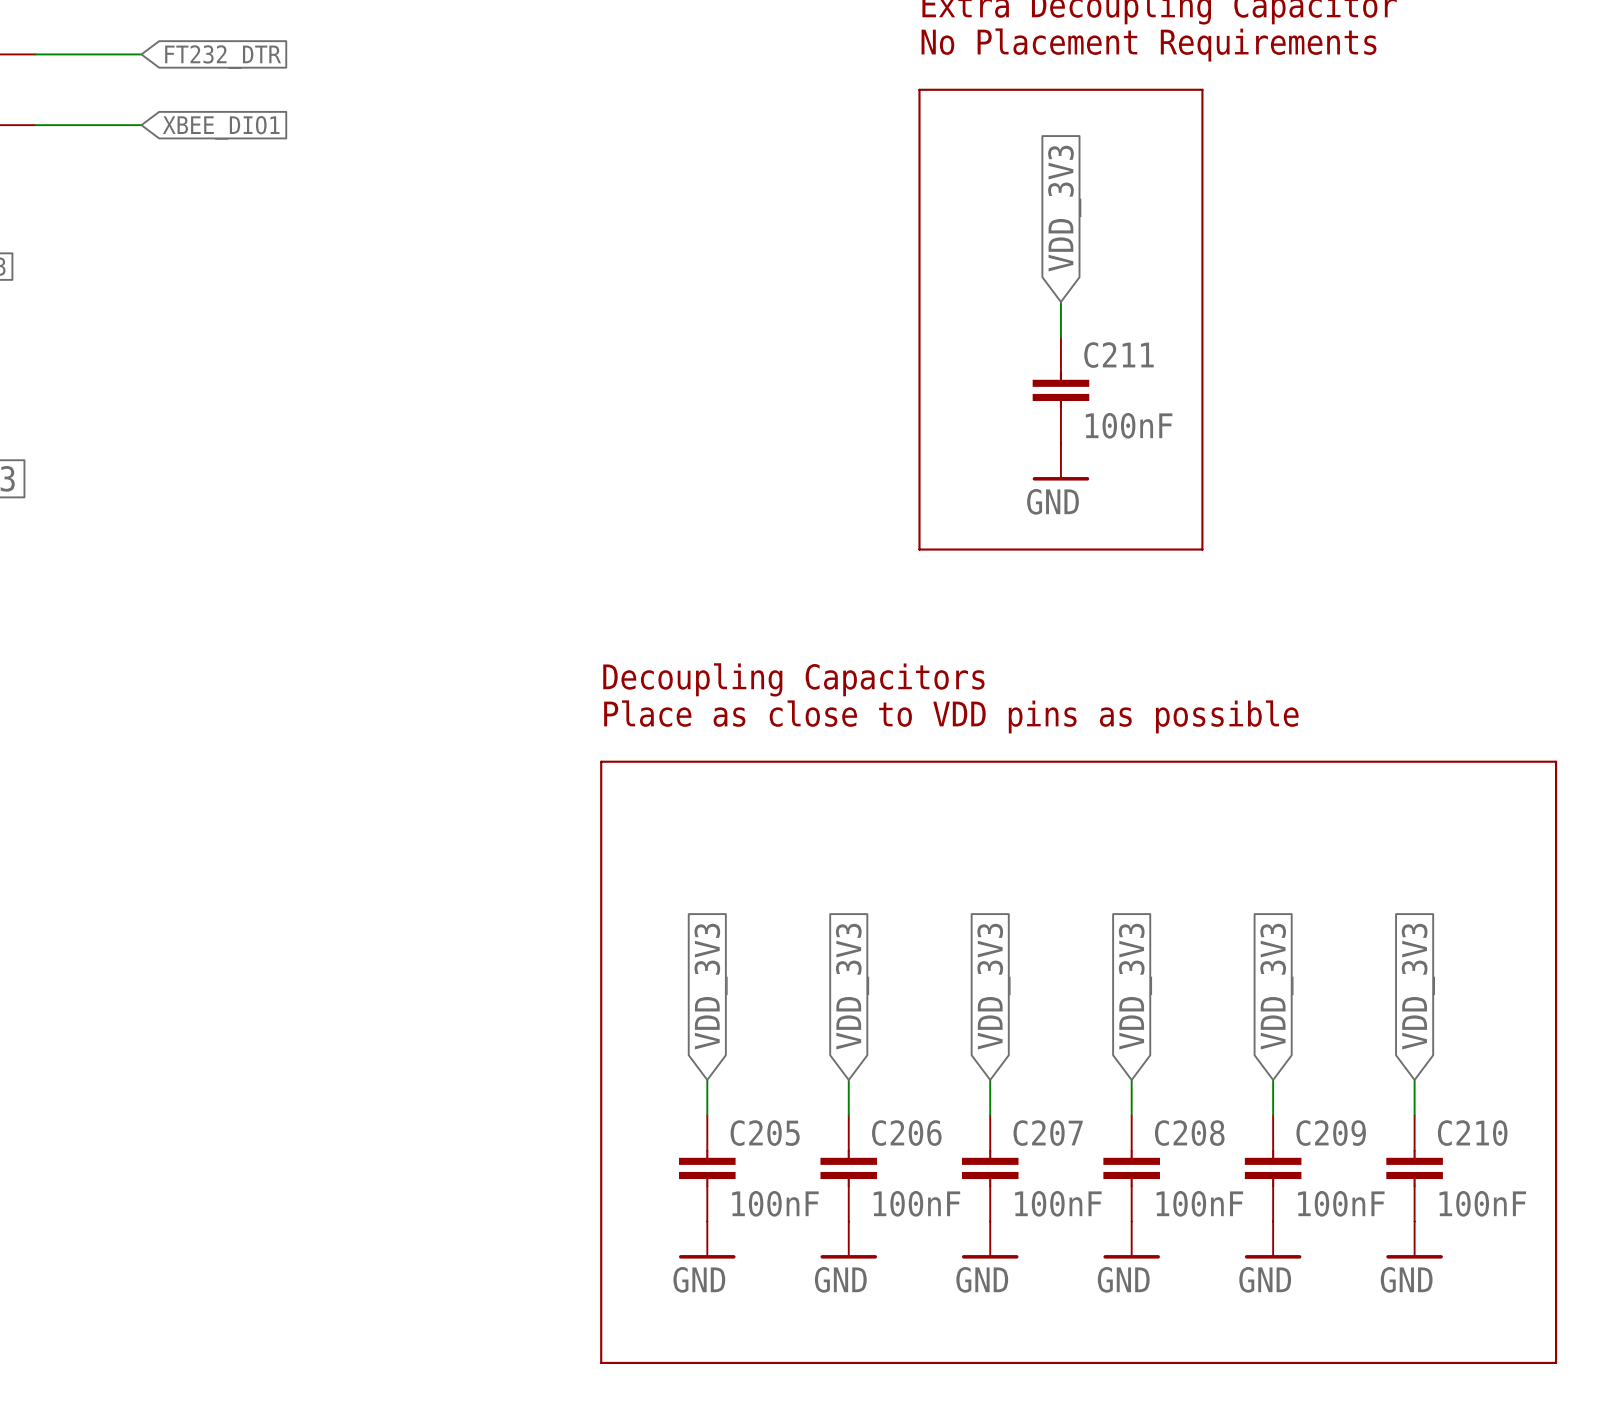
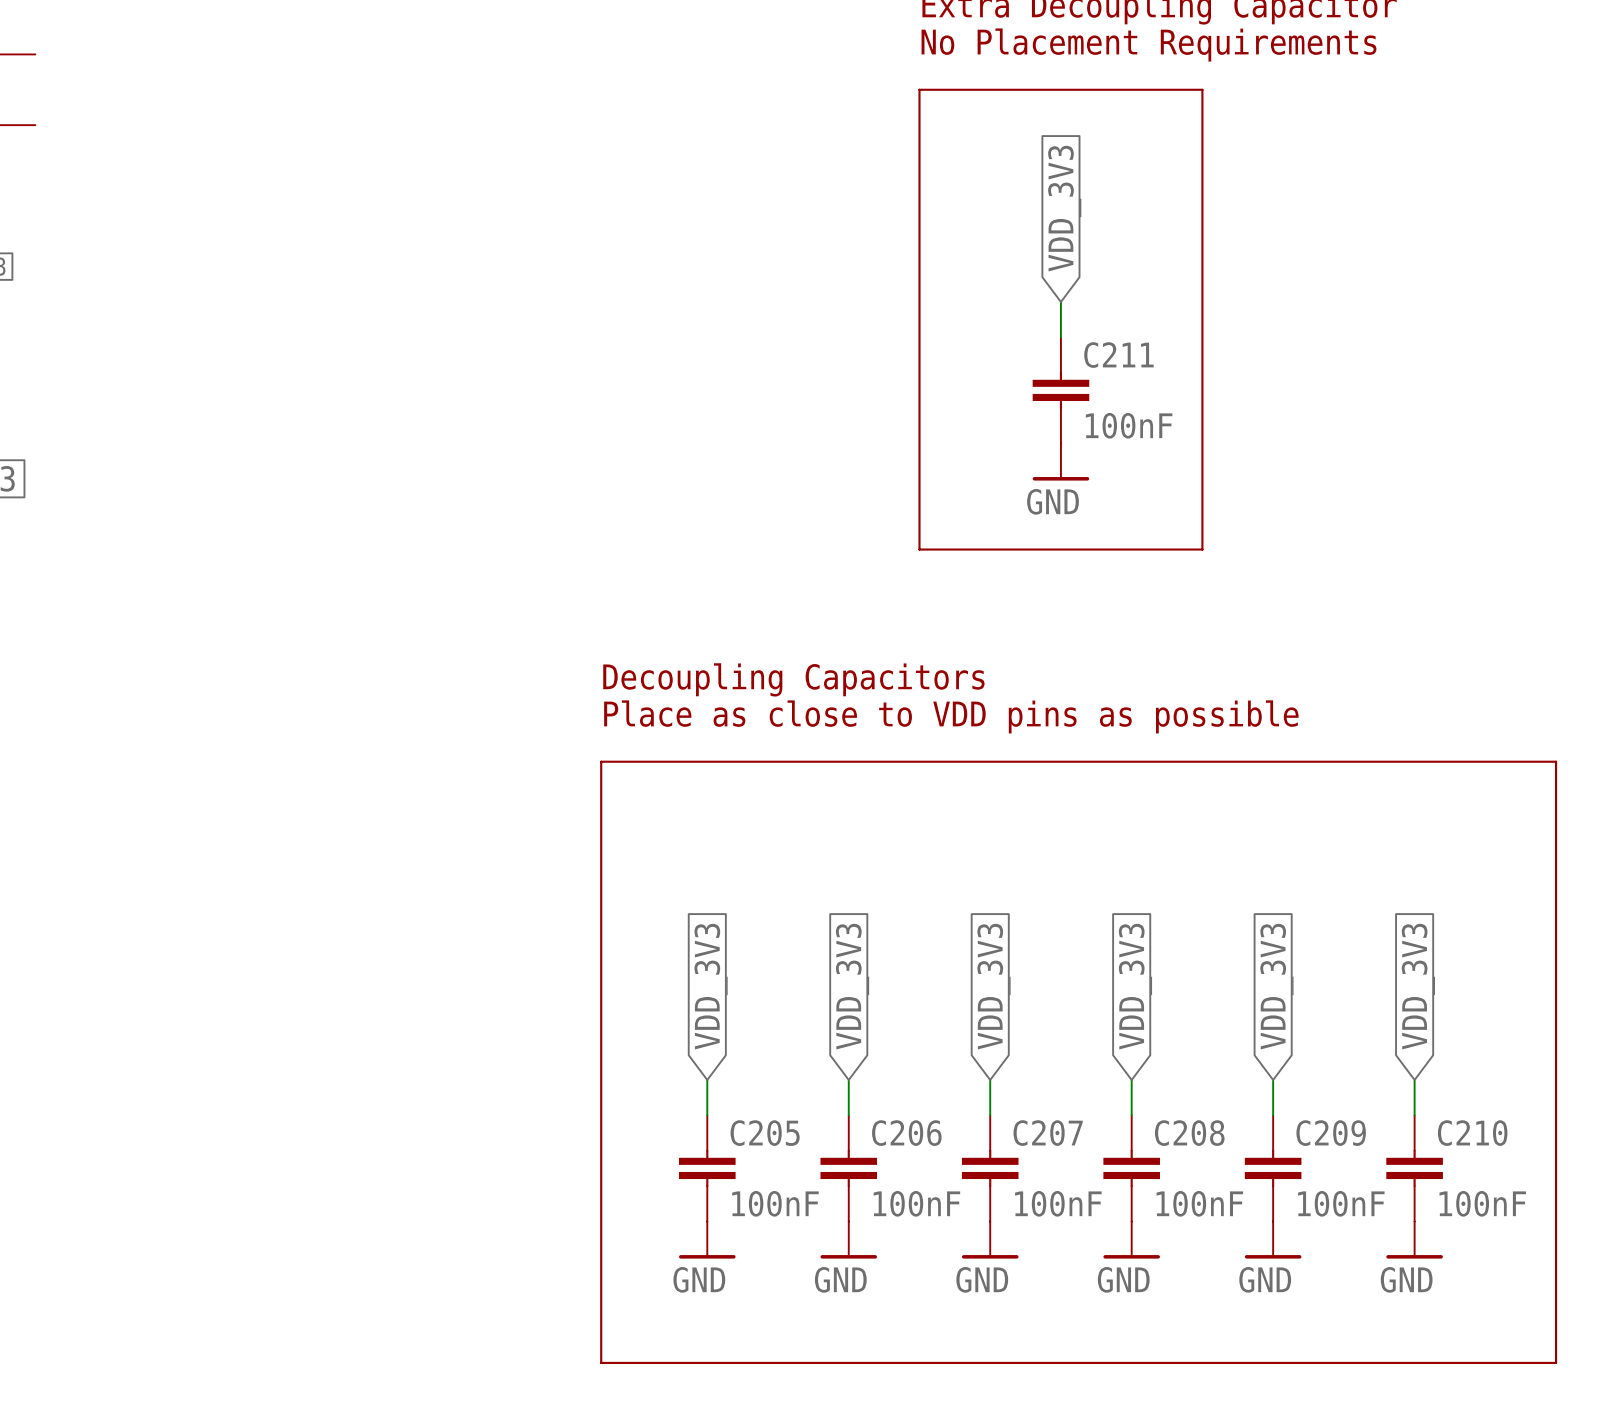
wire: (35, 54) (141, 54) -> none
global label: FT232_DTR (223, 57) -> none
wire: (35, 125) (141, 125) -> none
global label: XBEE_DIO1 (221, 127) -> none

